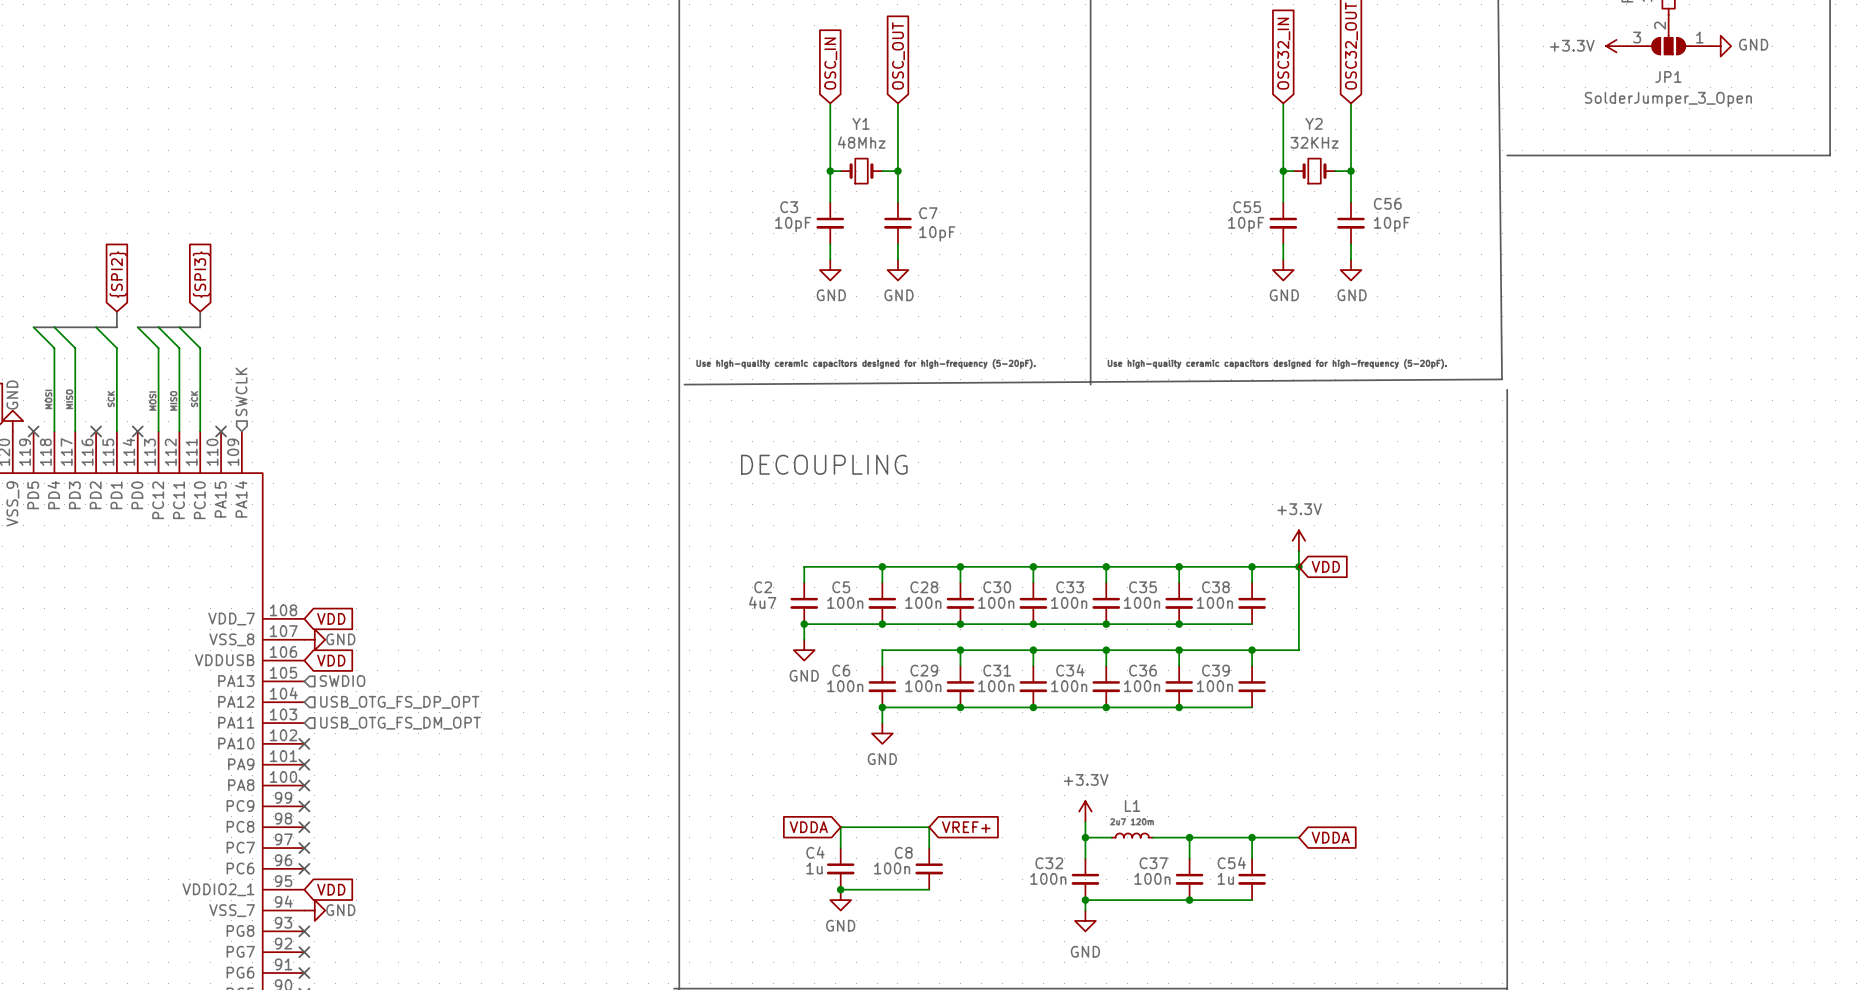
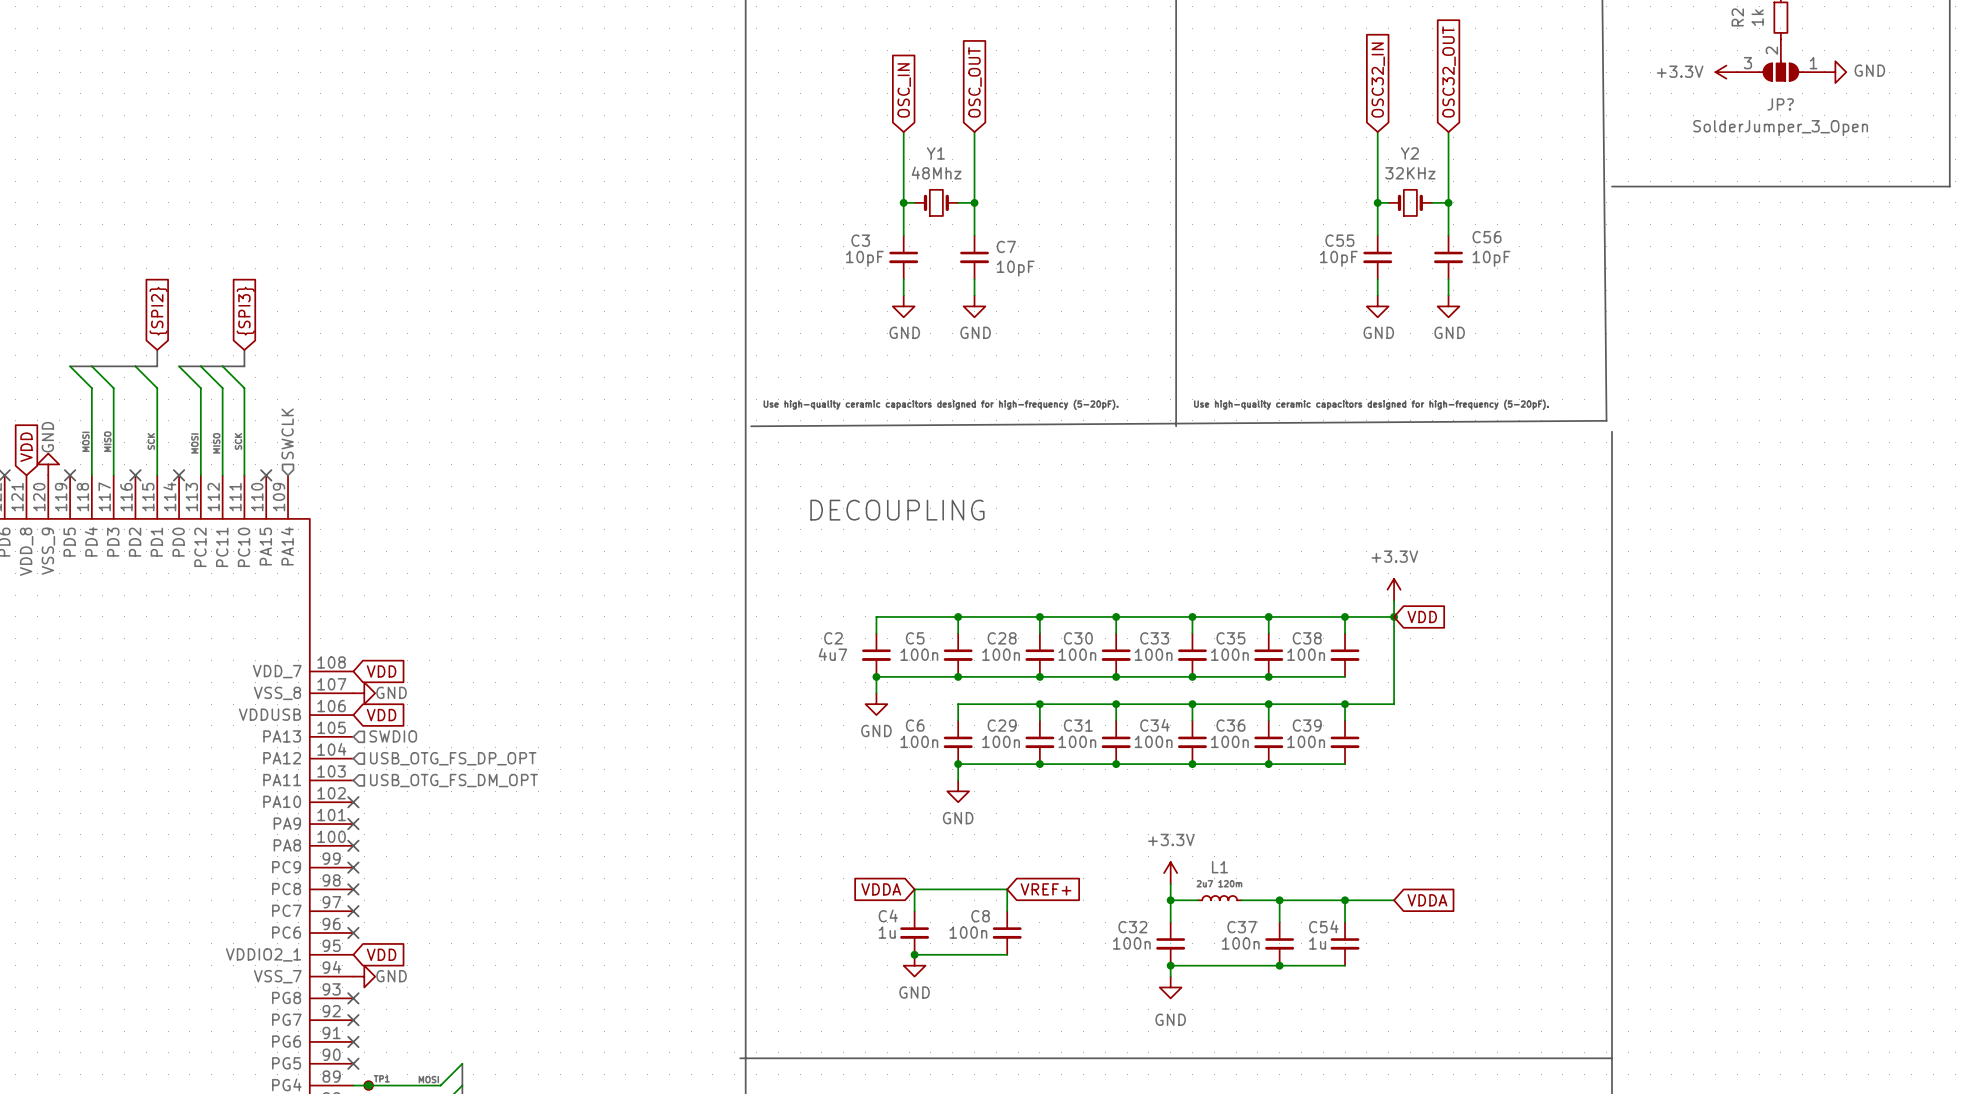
JP1 name: JP1 (1668, 76) -> JP? (1780, 104)

